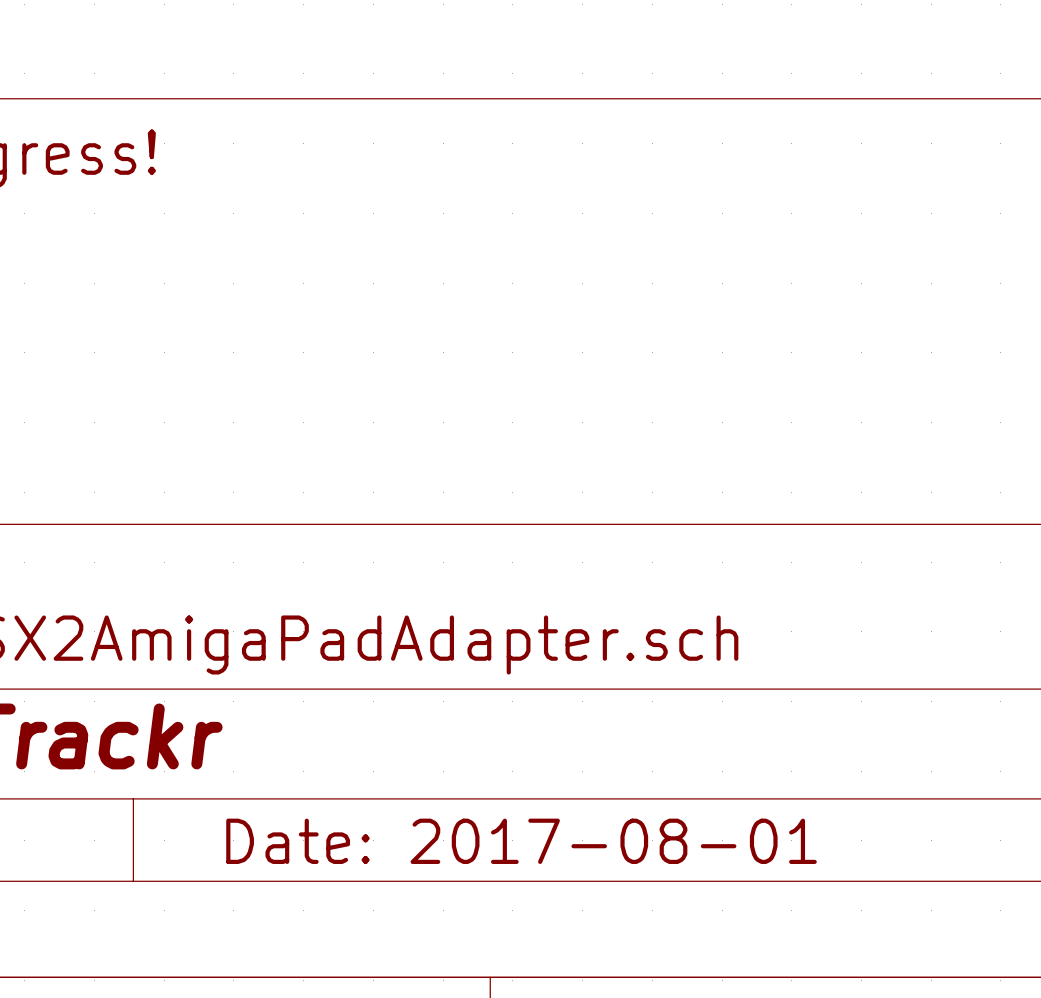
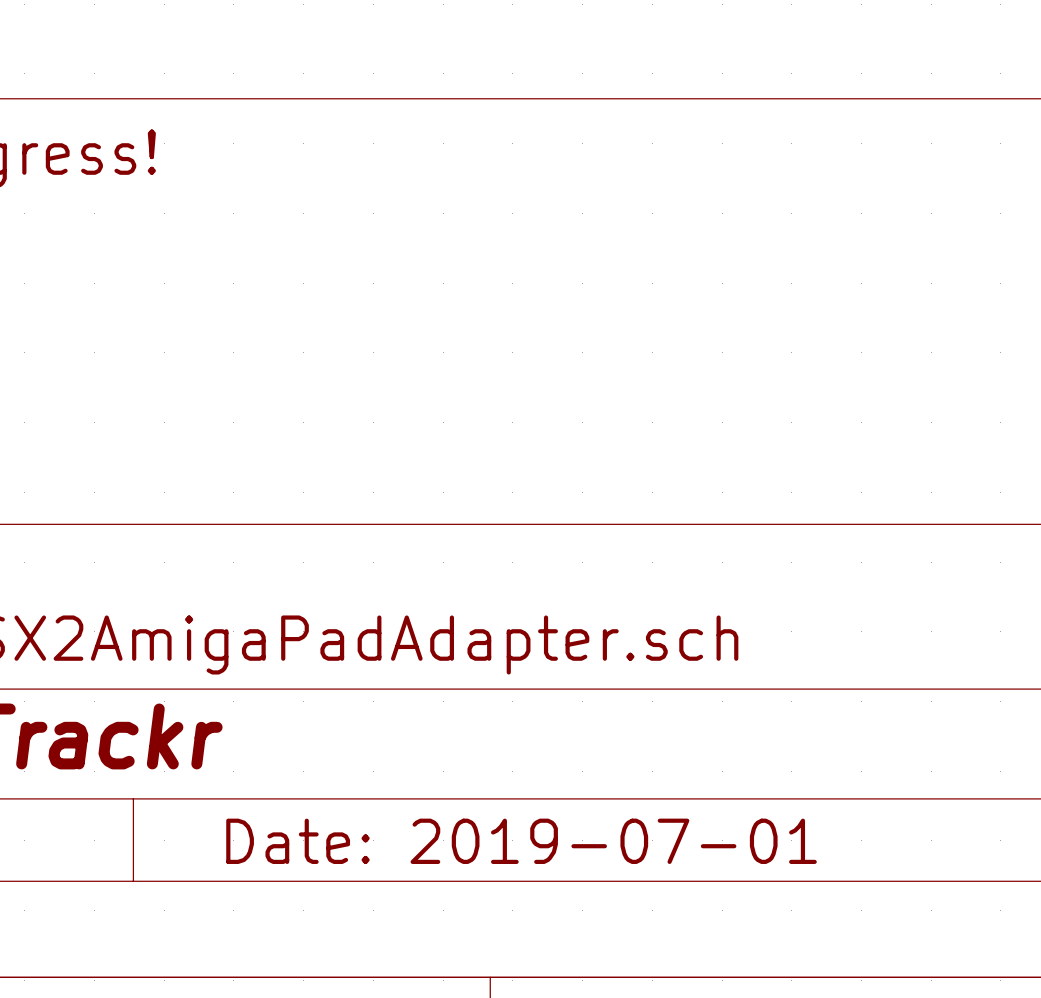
title block: Date: 2017-08-01 (521, 841) -> Date: 2019-07-01 (521, 841)

